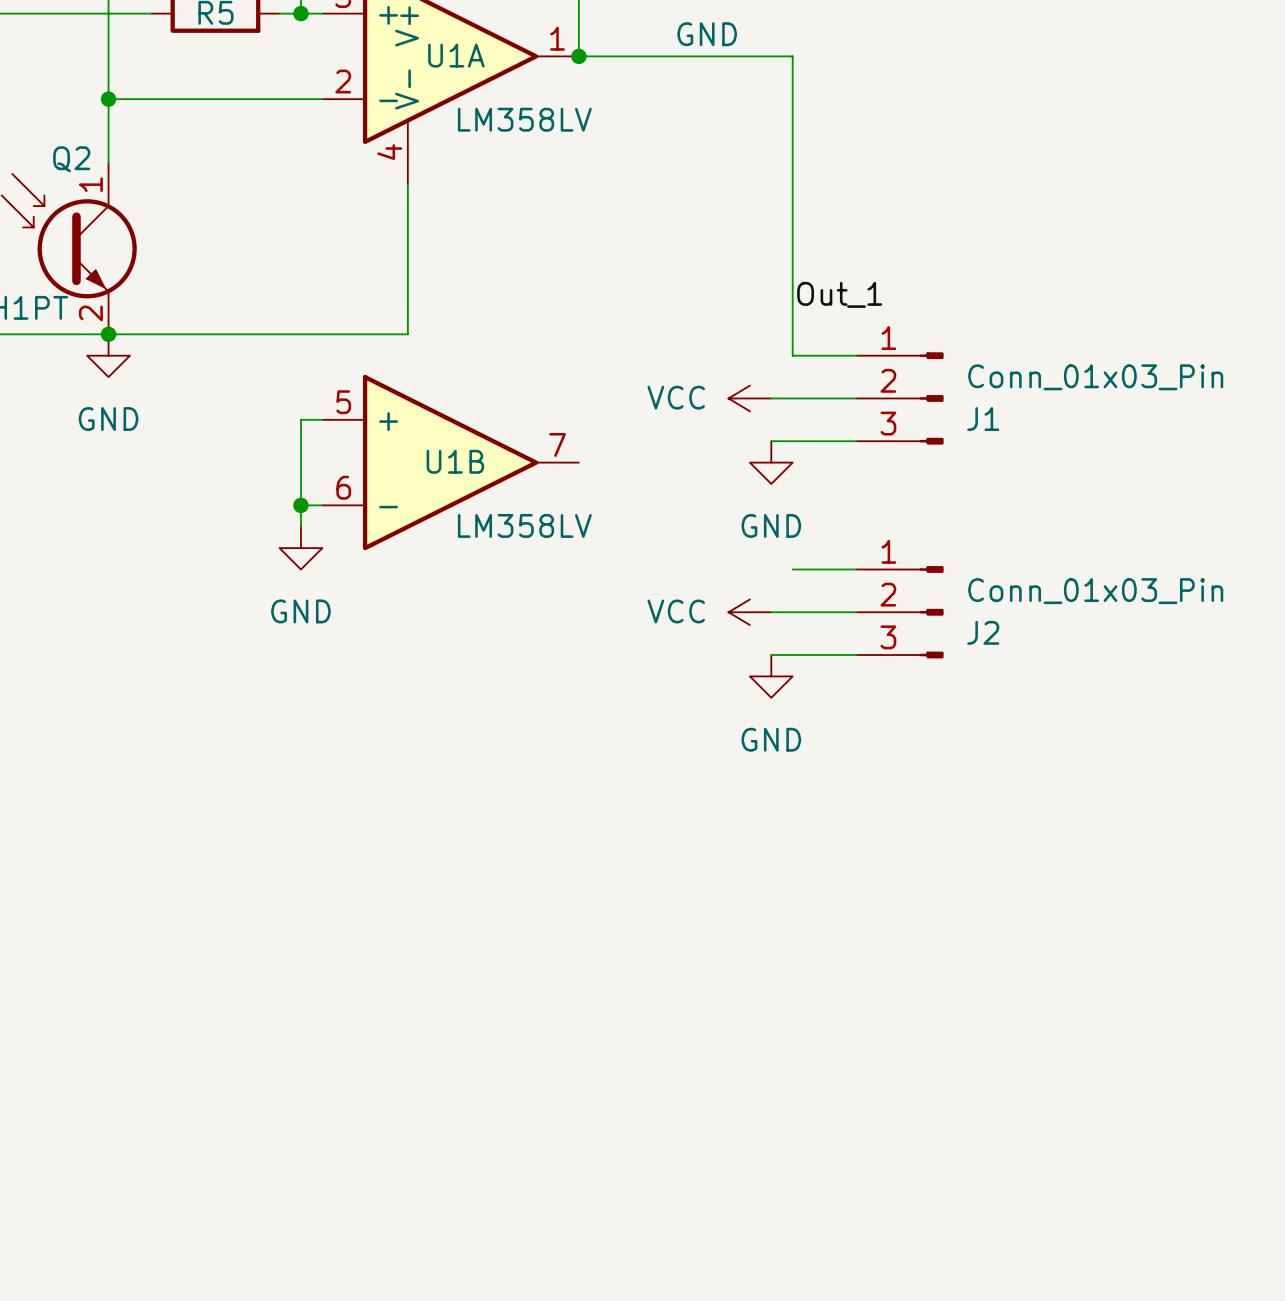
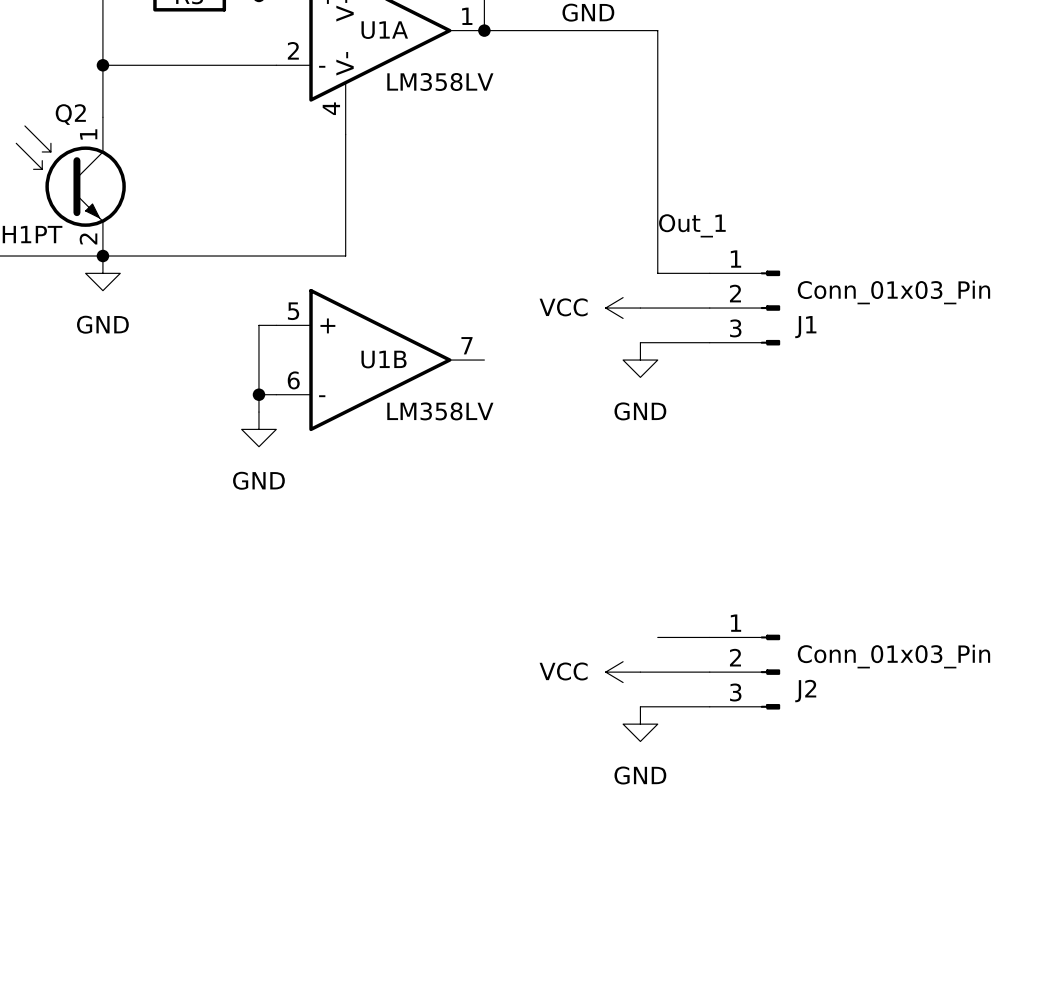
wire: (792, 569) (856, 569) -> (657, 637) (709, 637)
power symbol position: VCC (749, 612) -> VCC (623, 672)
wire: (771, 612) (856, 612) -> (640, 706) (709, 706)
J2 position: (900, 612) -> (744, 672)
wire: (771, 655) (856, 655) -> (640, 672) (709, 672)
power symbol position: GND (771, 676) -> GND (640, 724)

